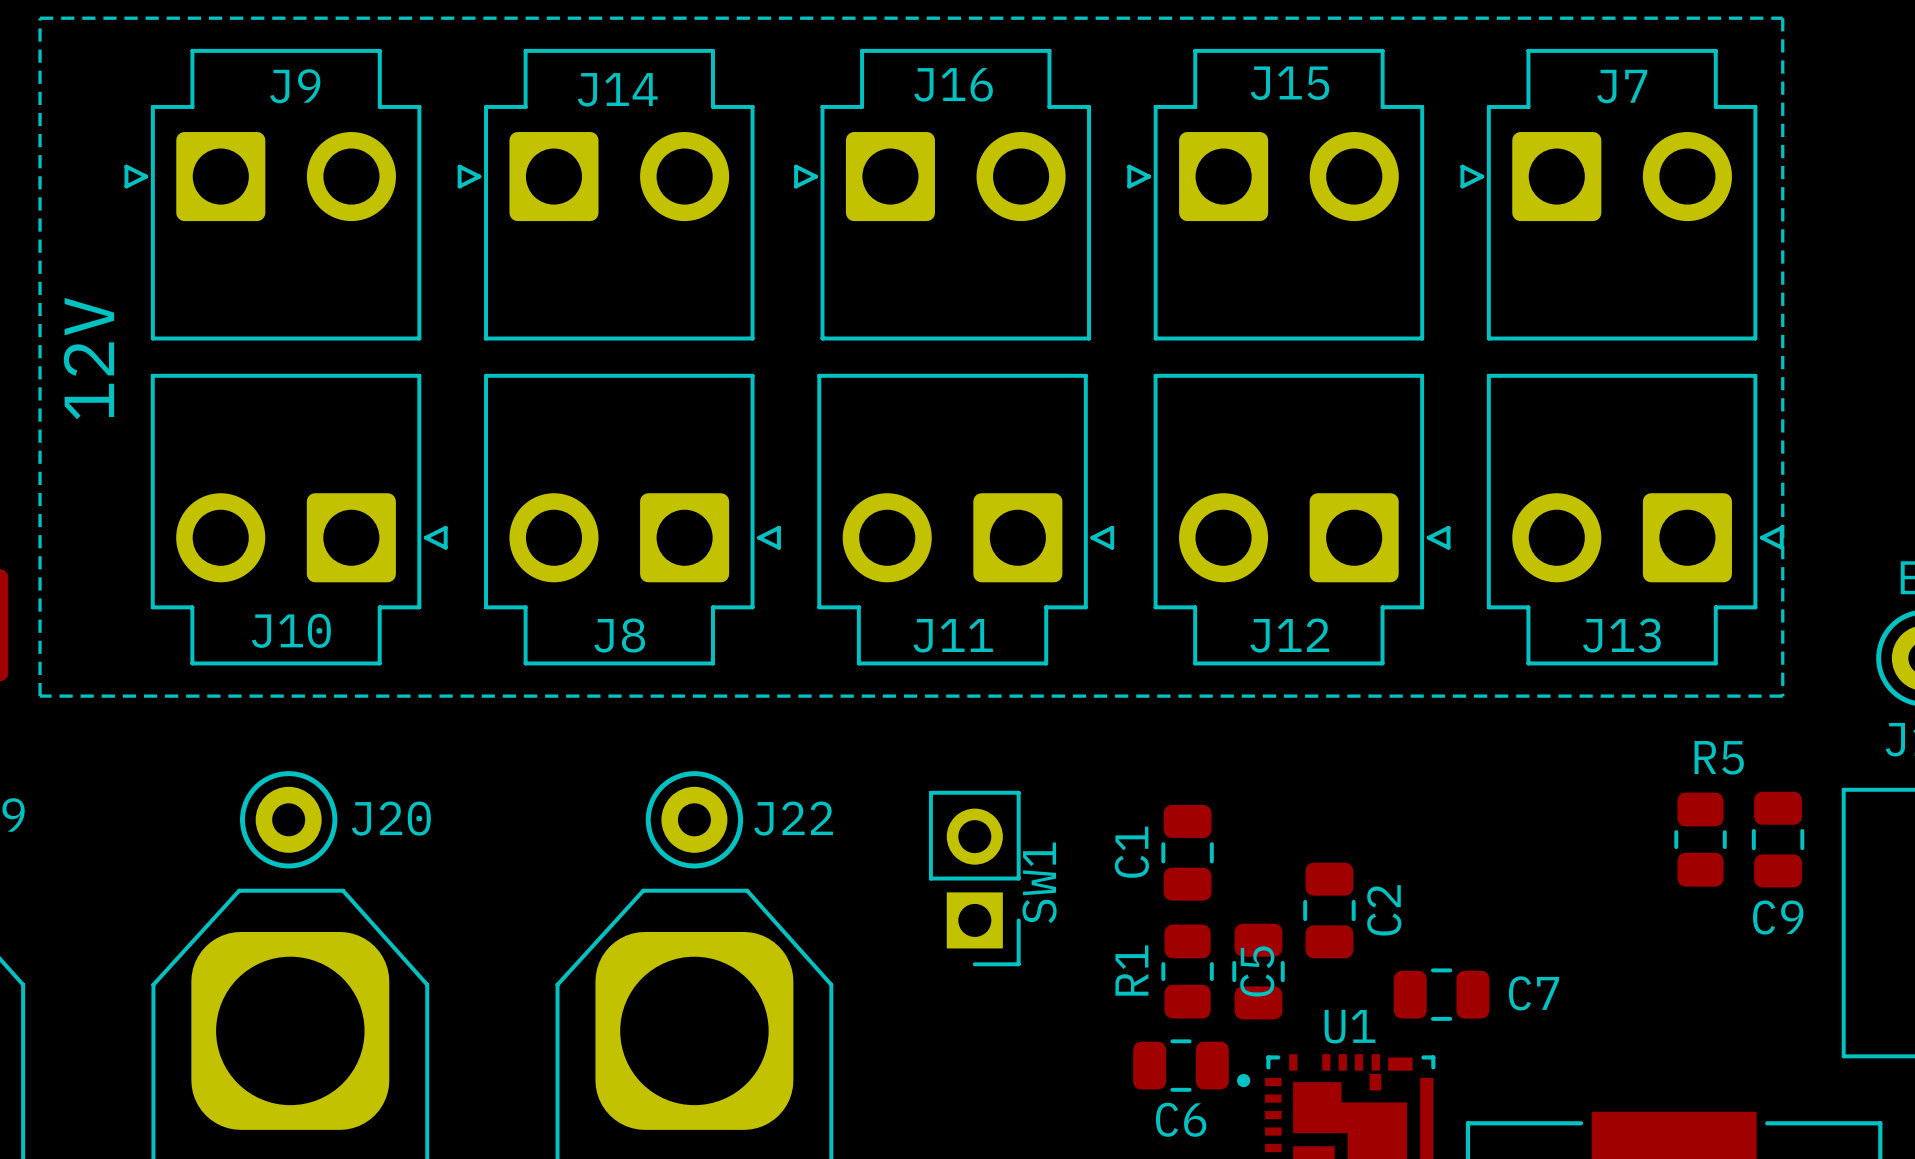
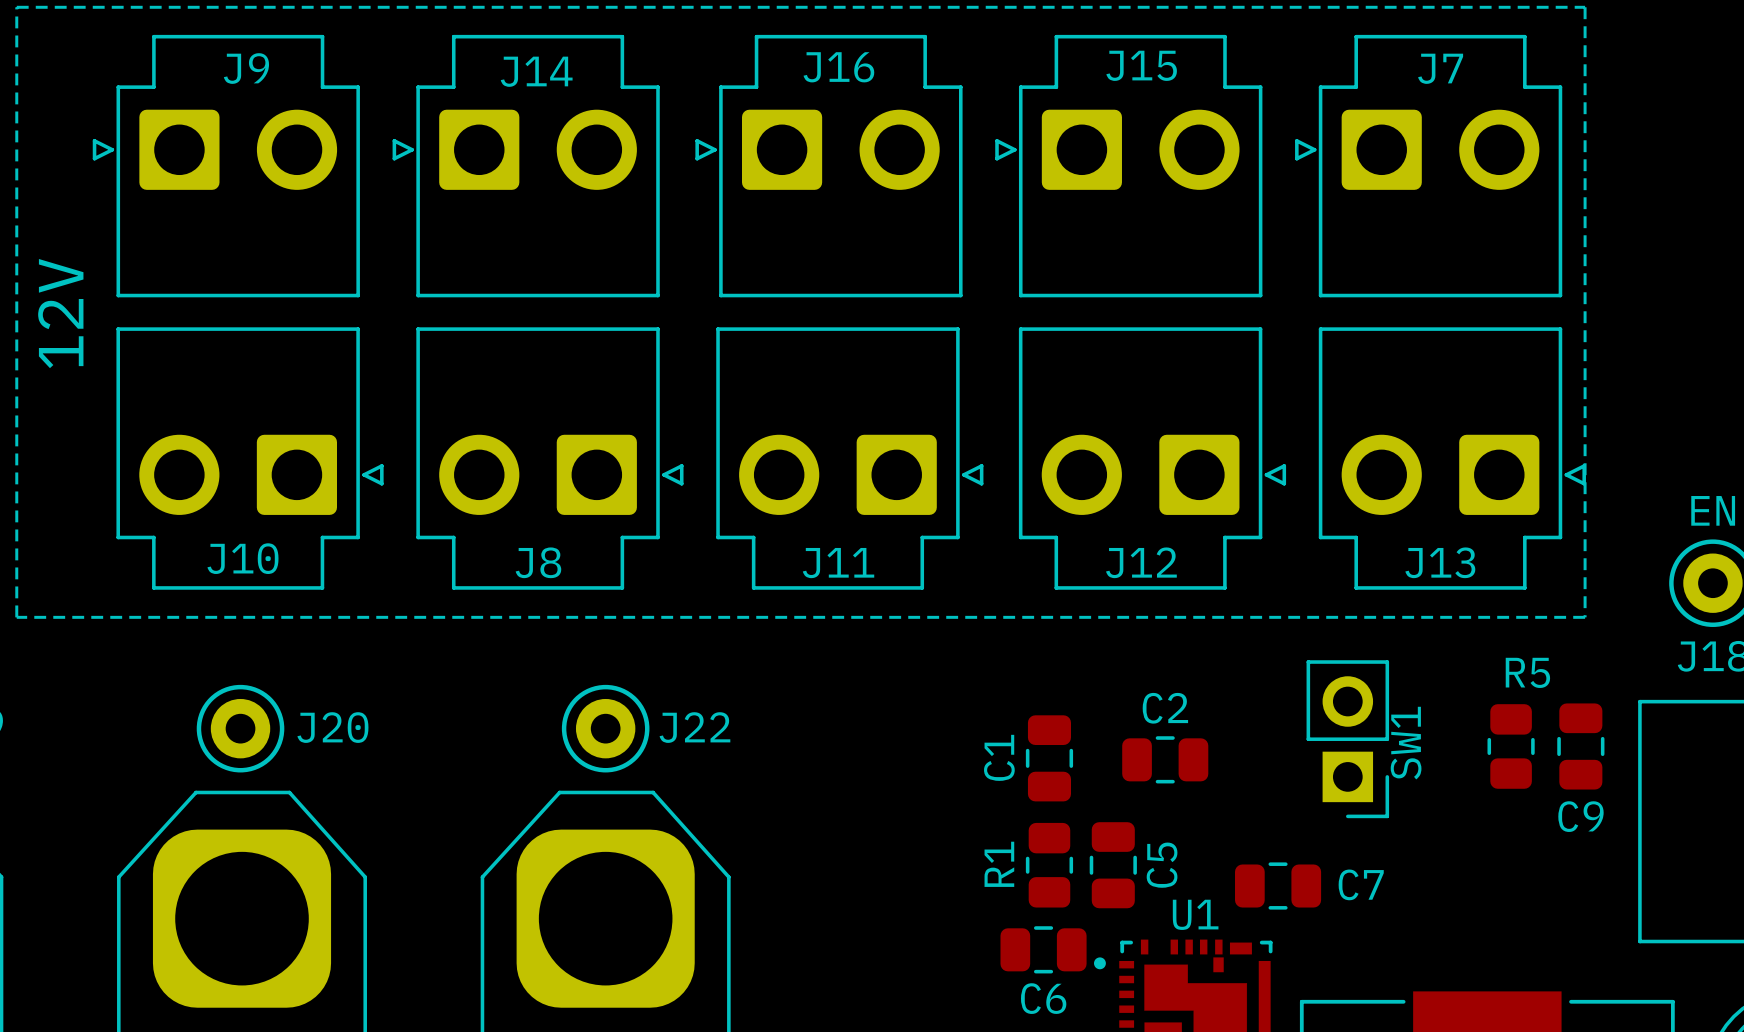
SW1 position: (974, 878) -> (1347, 739)
C2 rotation: 0° (1329, 910) -> 90° clockwise (1165, 759)
C2 position: (1329, 910) -> (1165, 759)
C2 name position: C2 (1384, 910) -> C2 (1165, 708)
C5 name position: C5 (1257, 971) -> C5 (1162, 865)

